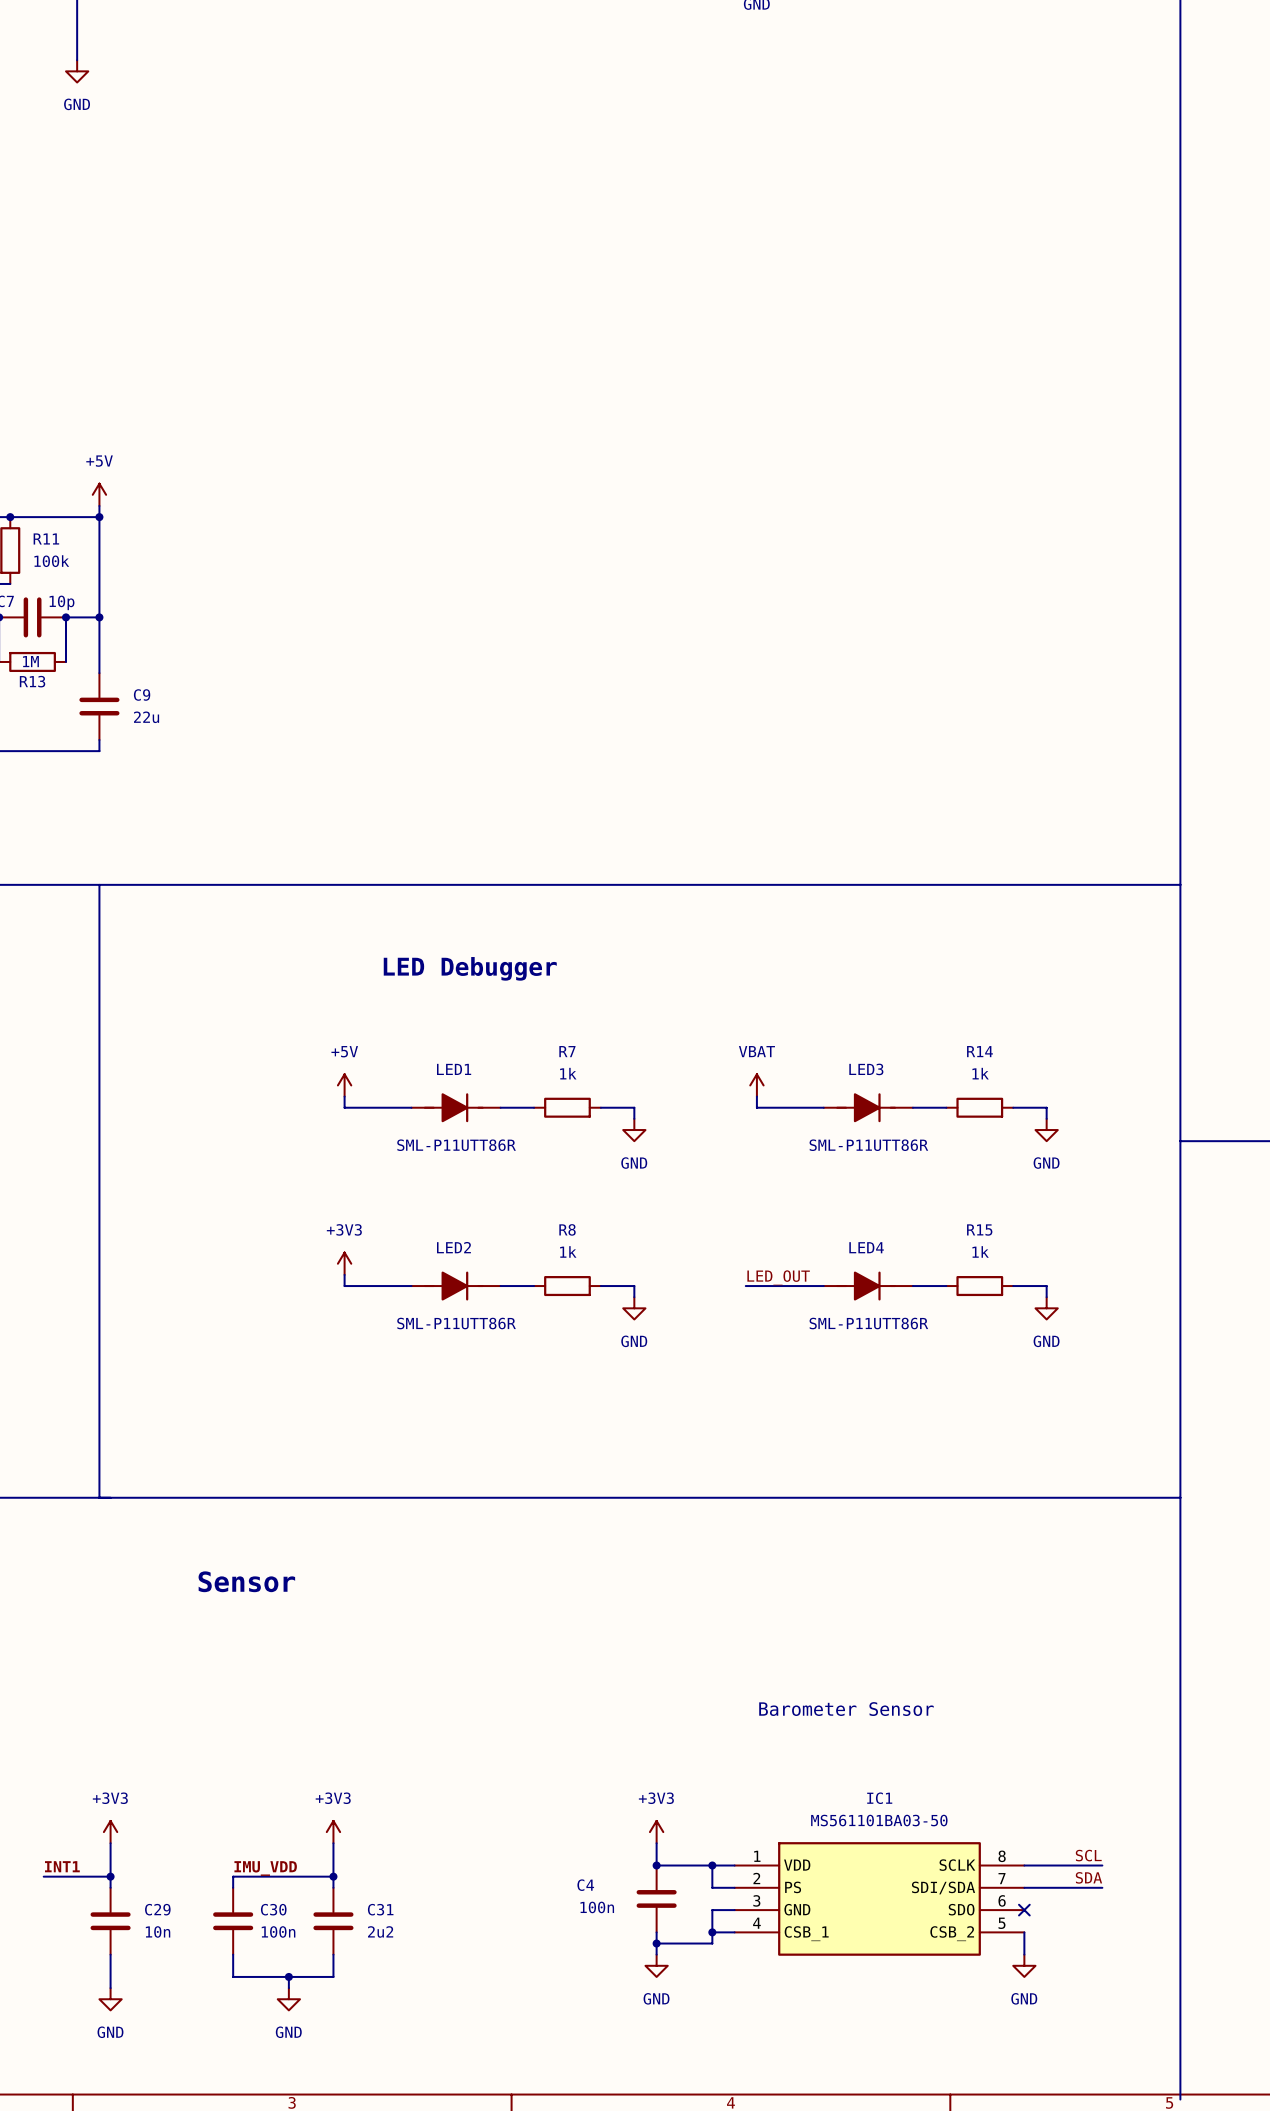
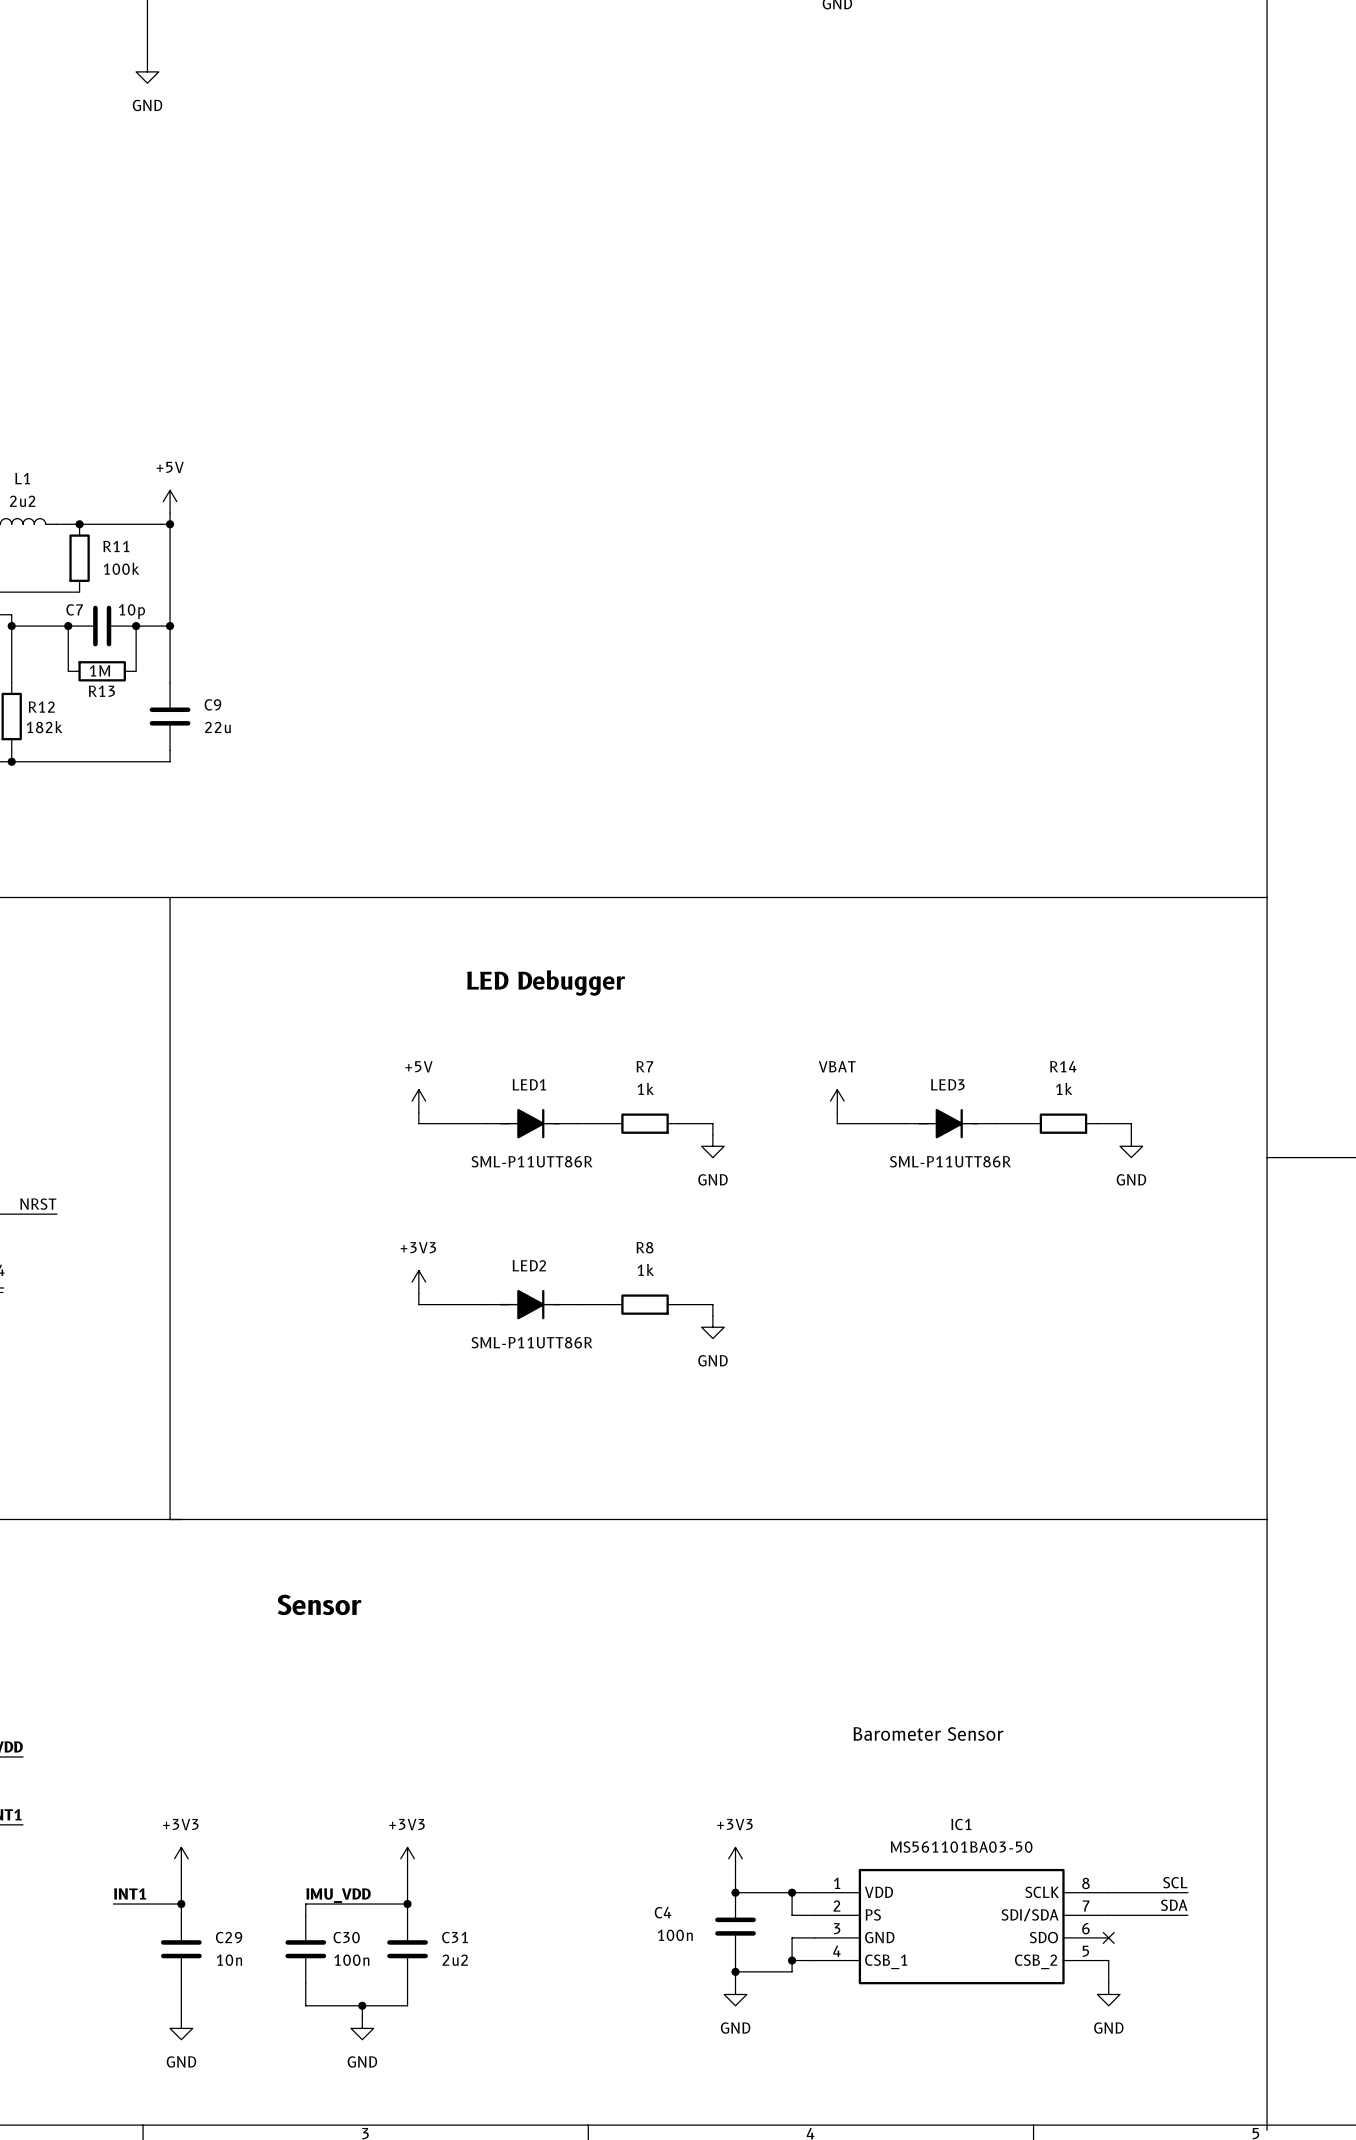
label: LED_OUT (778, 1277) -> none
wire: (745, 1286) (823, 1286) -> none
LED4: SML-P11UTT86R (868, 1286) -> none
wire: (912, 1286) (946, 1286) -> none
R15: 1k (979, 1286) -> none
wire: (1013, 1286) (1046, 1286) (1046, 1297) -> none
power symbol: GND (1046, 1308) -> none

